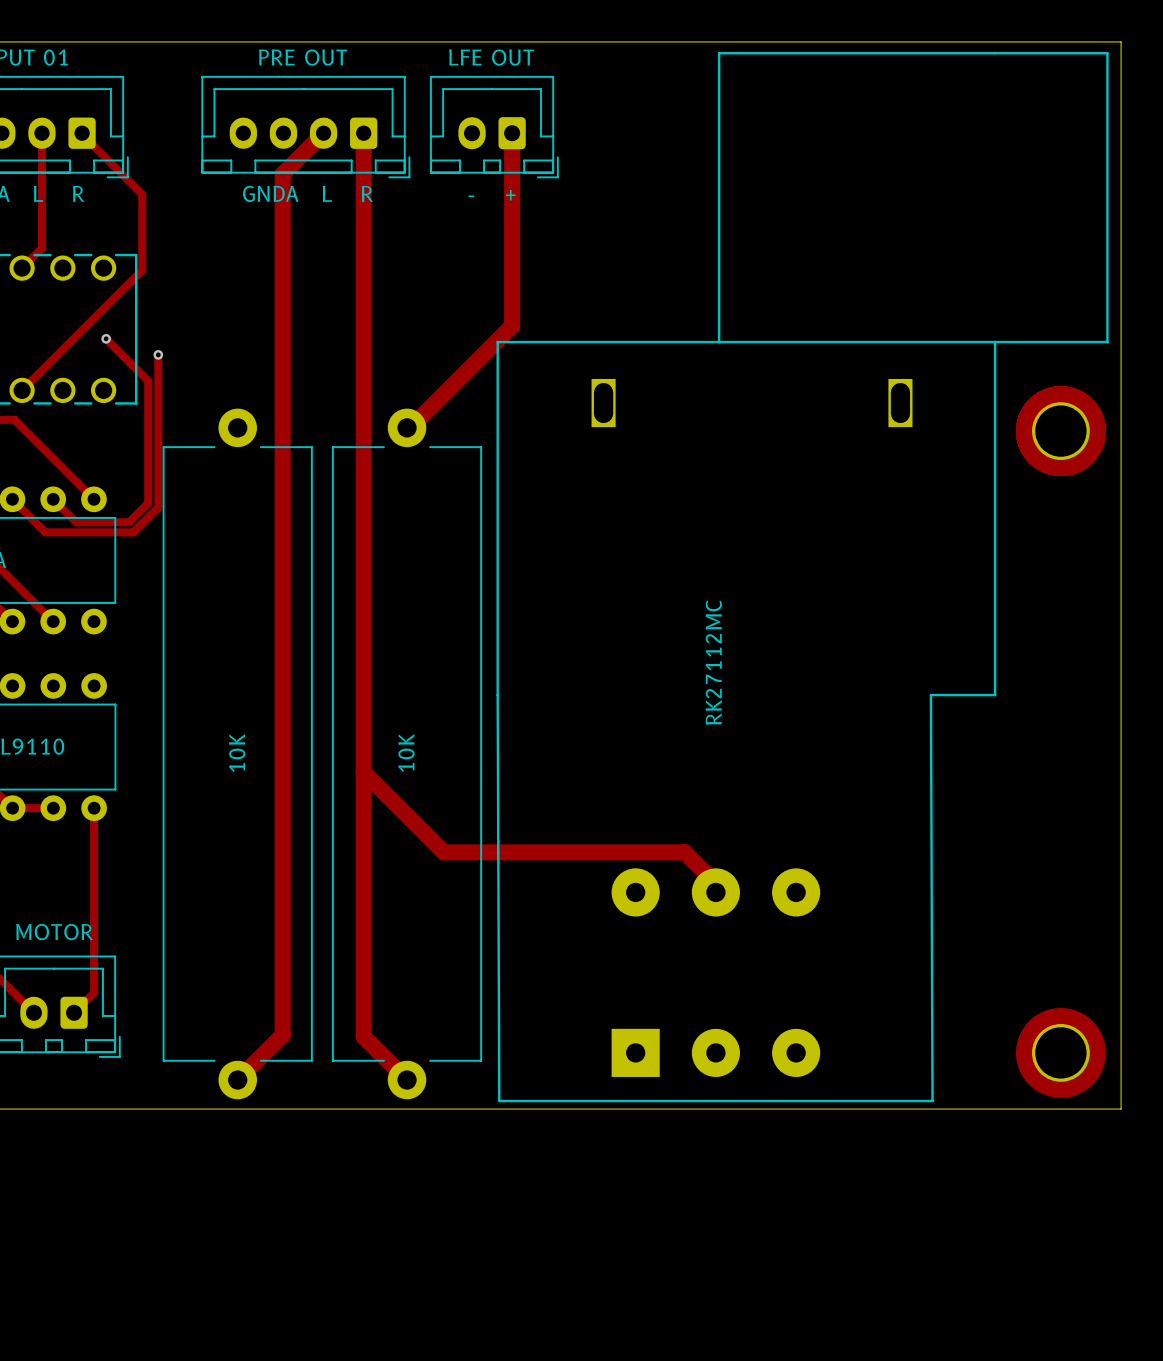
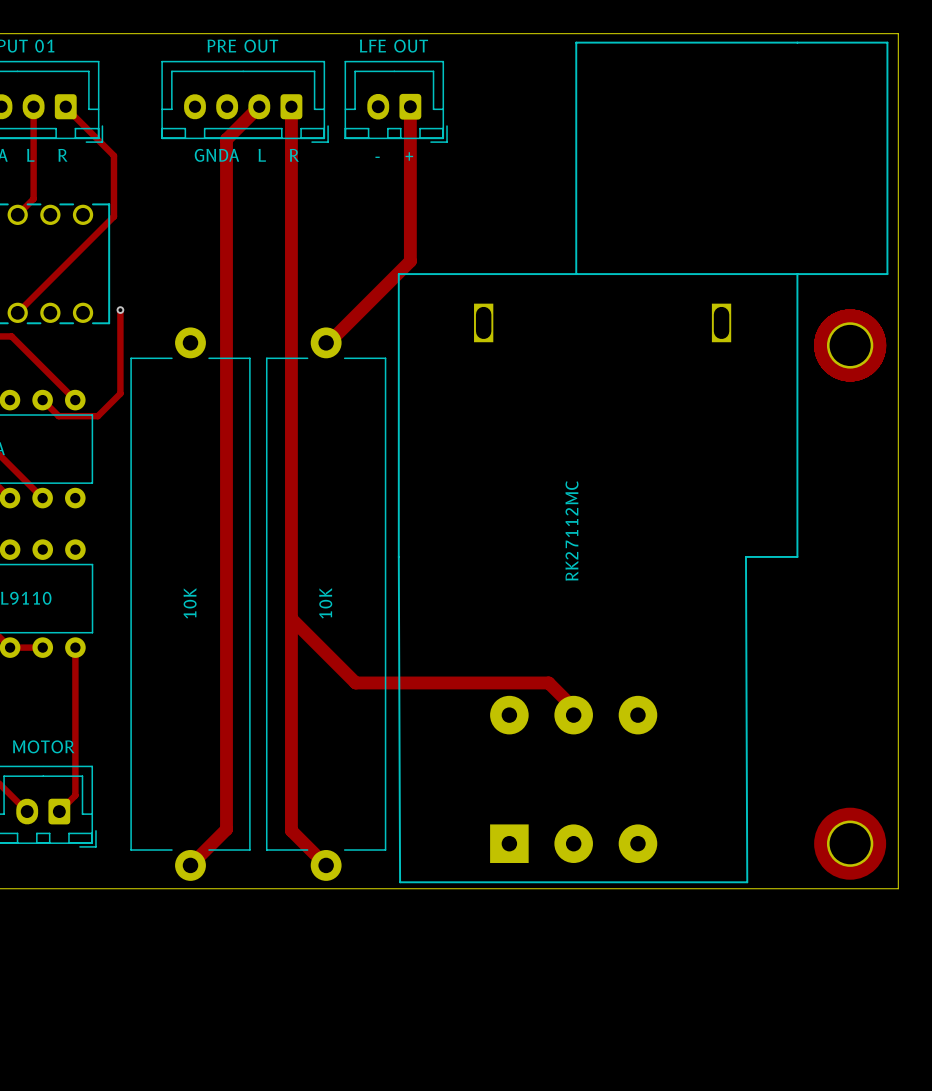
track: (106, 338) (148, 380) (148, 503) (129, 522) (76, 522) (73, 519) -> (120, 310) (120, 393) (97, 416) (58, 416)
via: (106, 338) -> none
track: (158, 354) (158, 507) (133, 532) (45, 532) (12, 499) -> none
via: (158, 354) -> none
via: none -> (120, 310)

